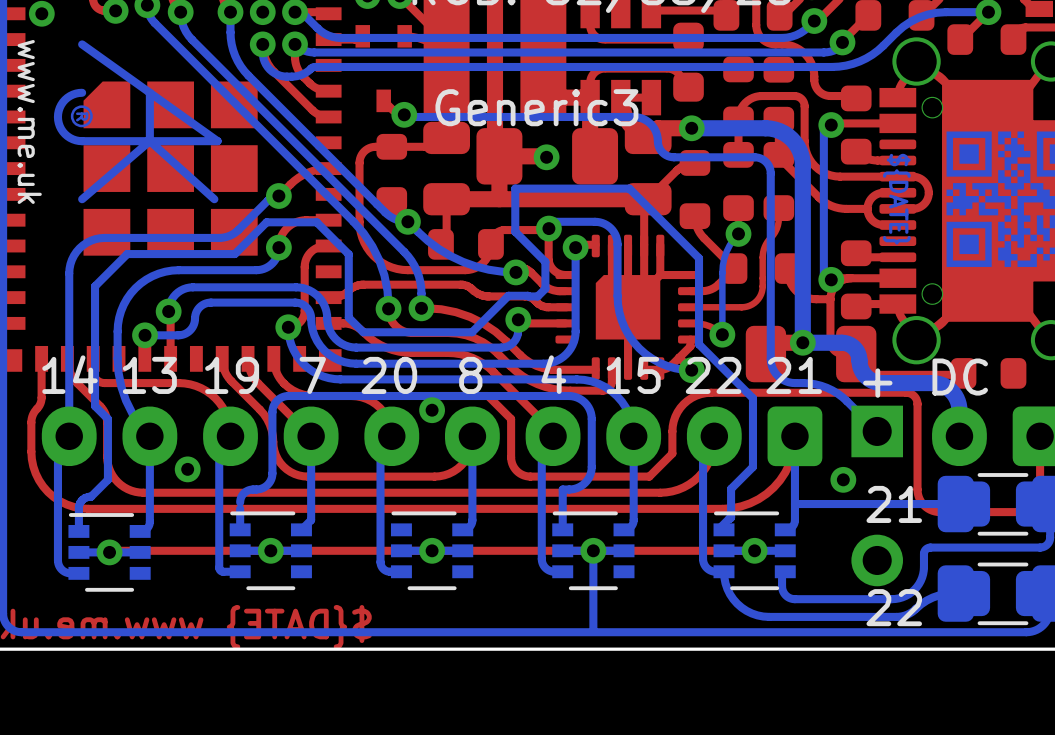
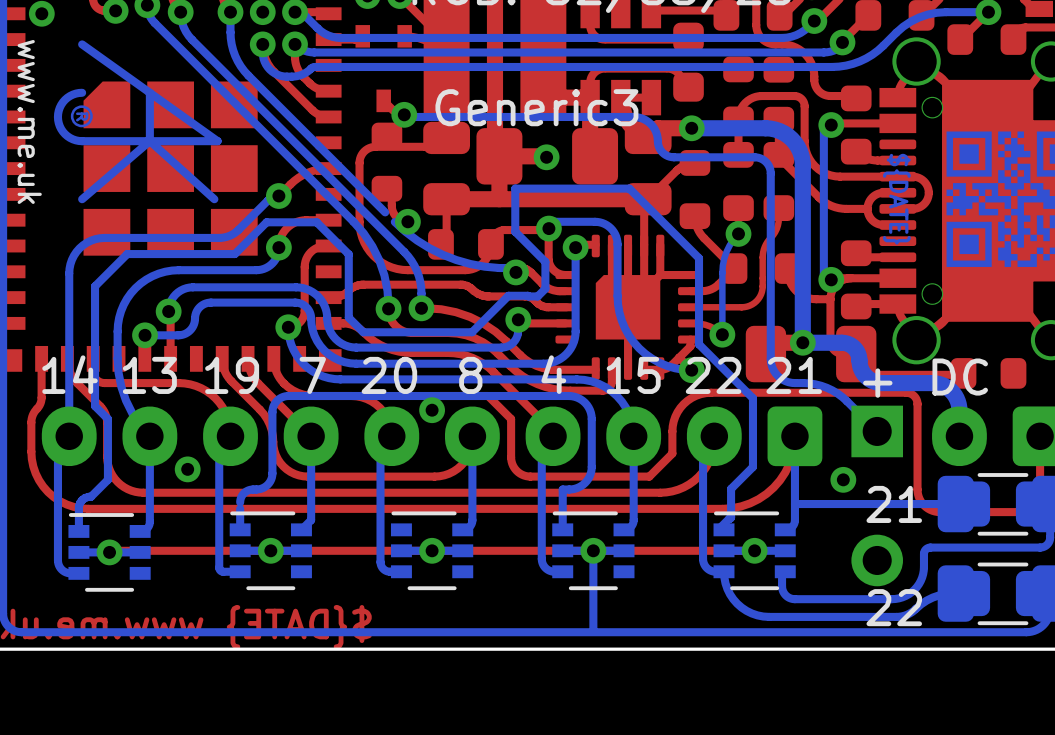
part position: (391, 173) -> (386, 162)
bottom track: (385, 212) (395, 219) (407, 221) (438, 249) (462, 261) (488, 269) (515, 272) -> (394, 222) (417, 240) (442, 254) (470, 264) (511, 268) (515, 272)

